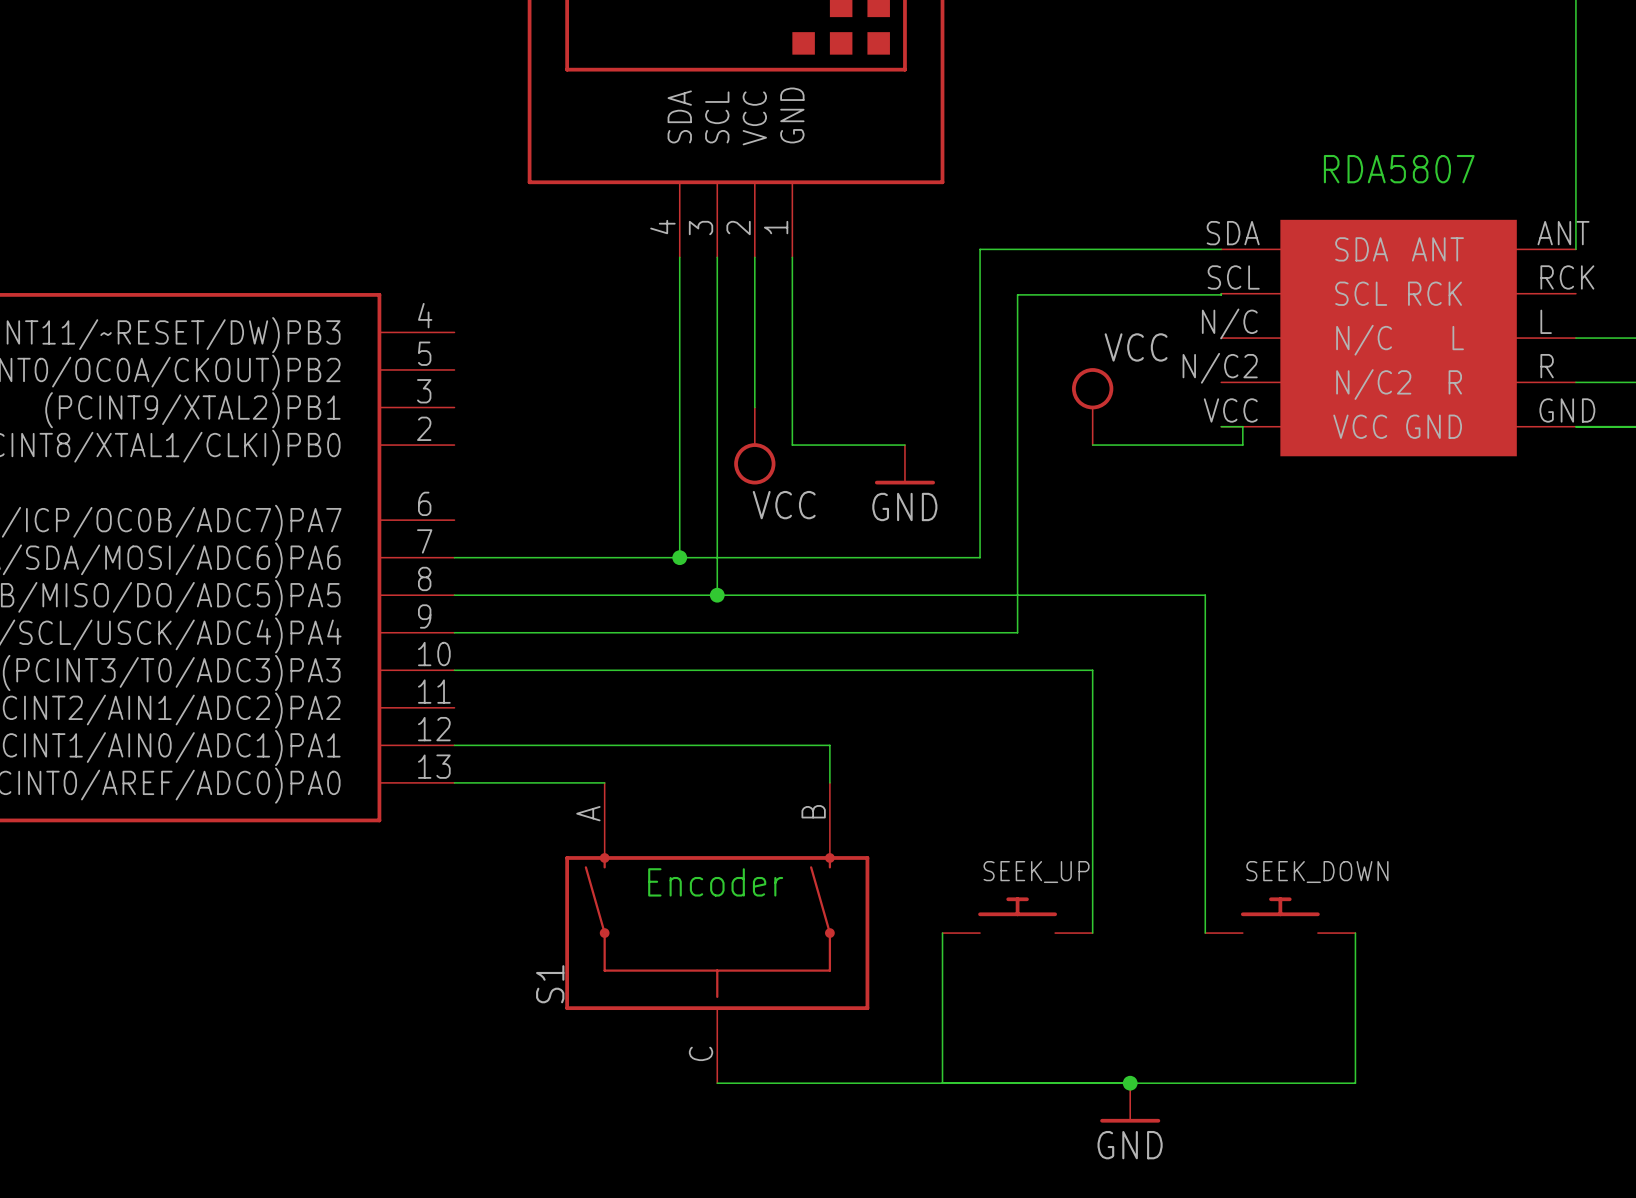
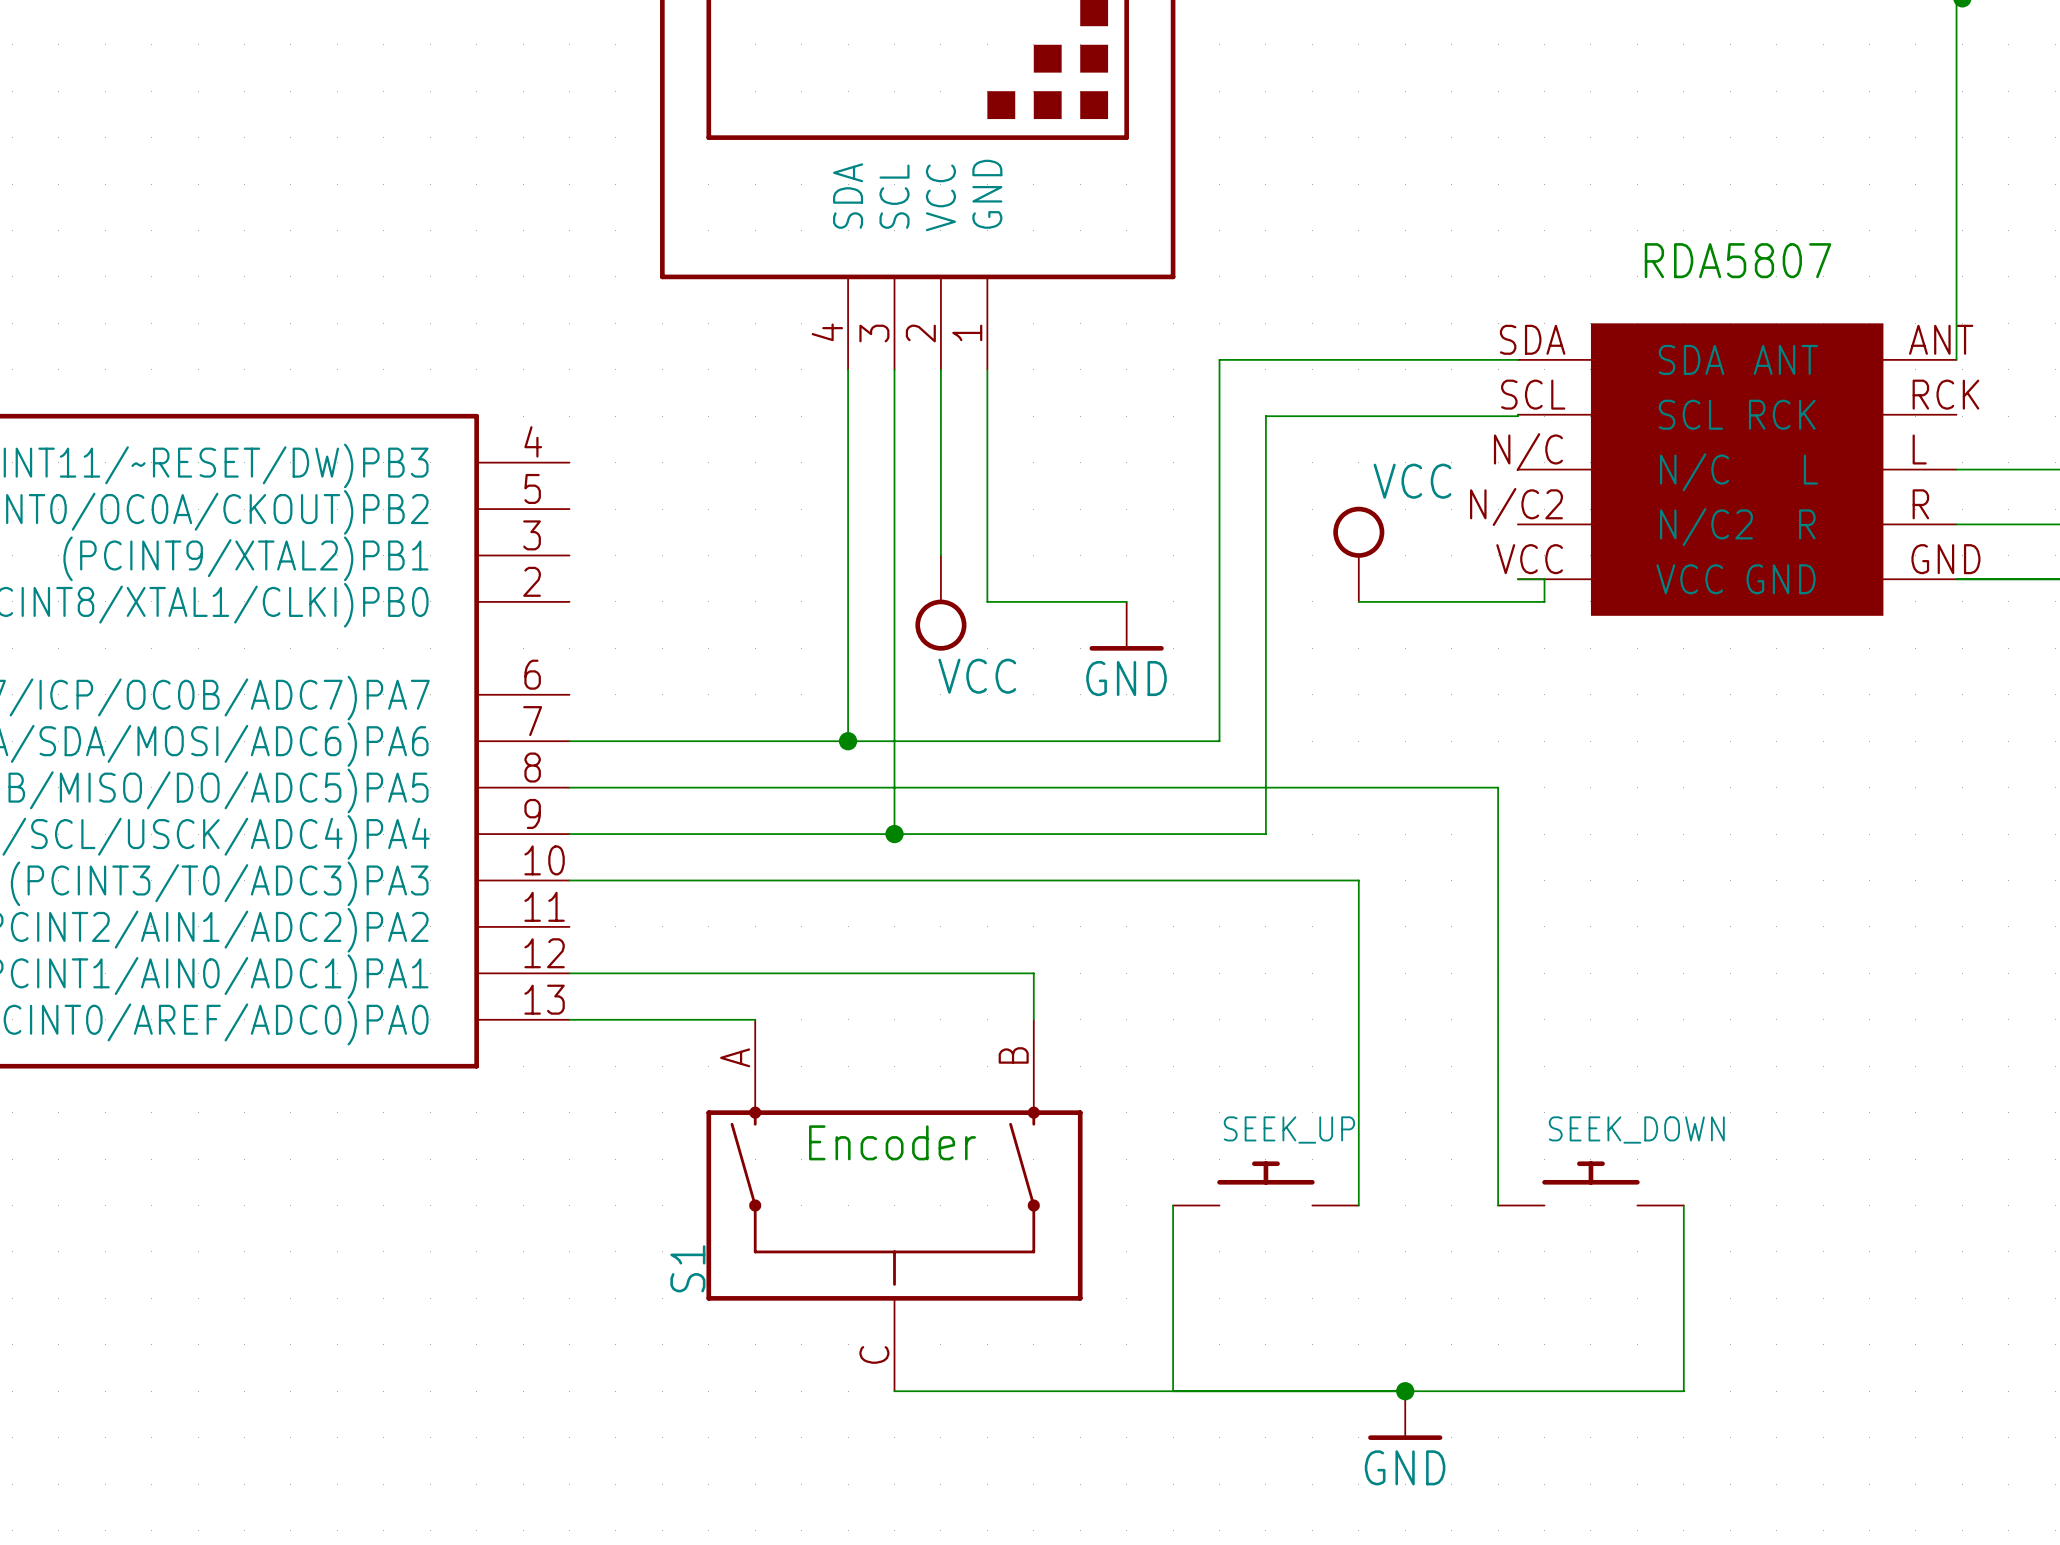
wire: none -> (894, 787) (894, 834)
junction position: (717, 595) -> (894, 834)

